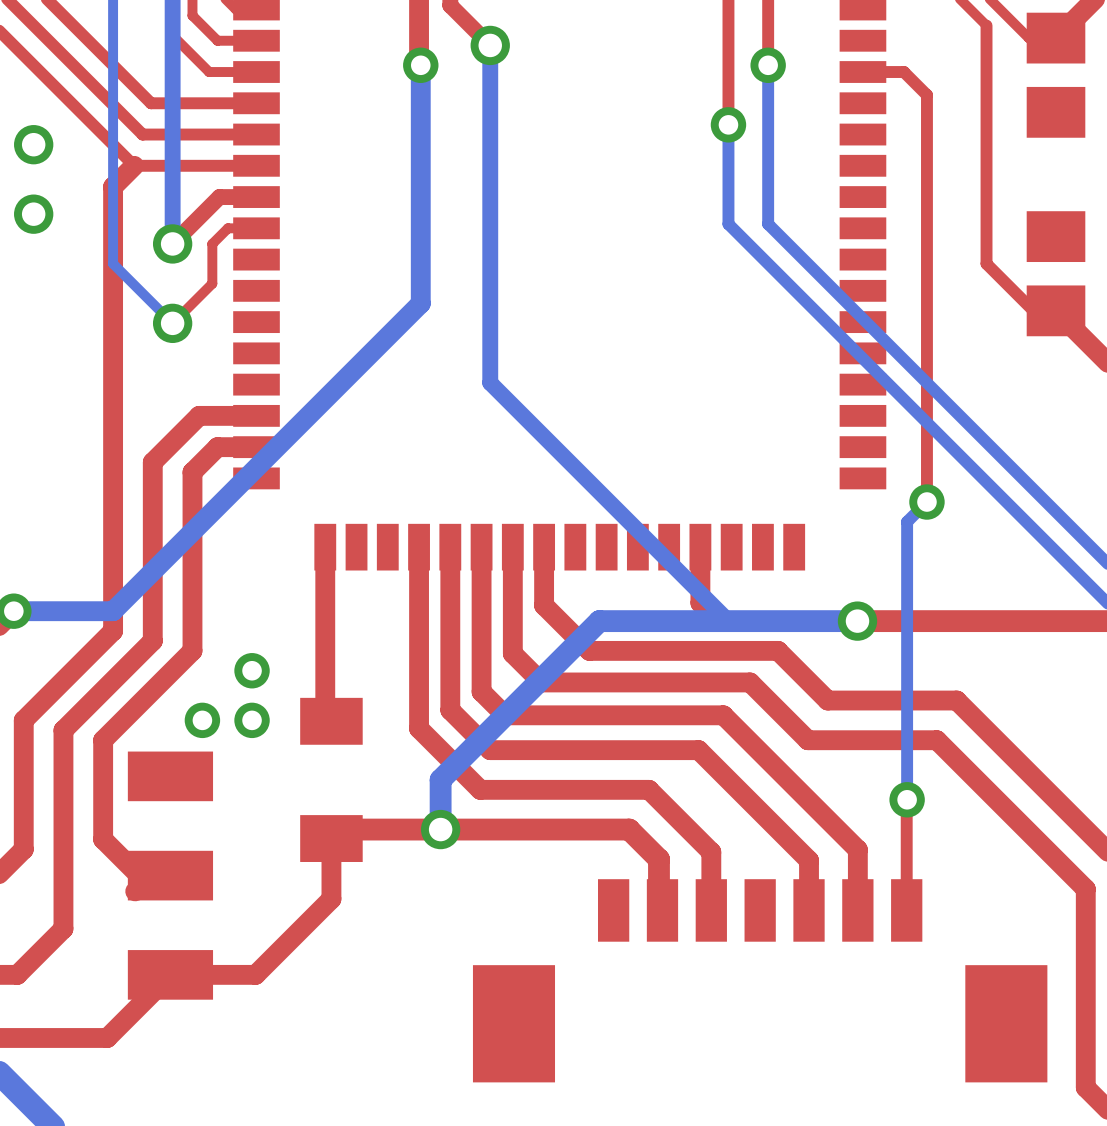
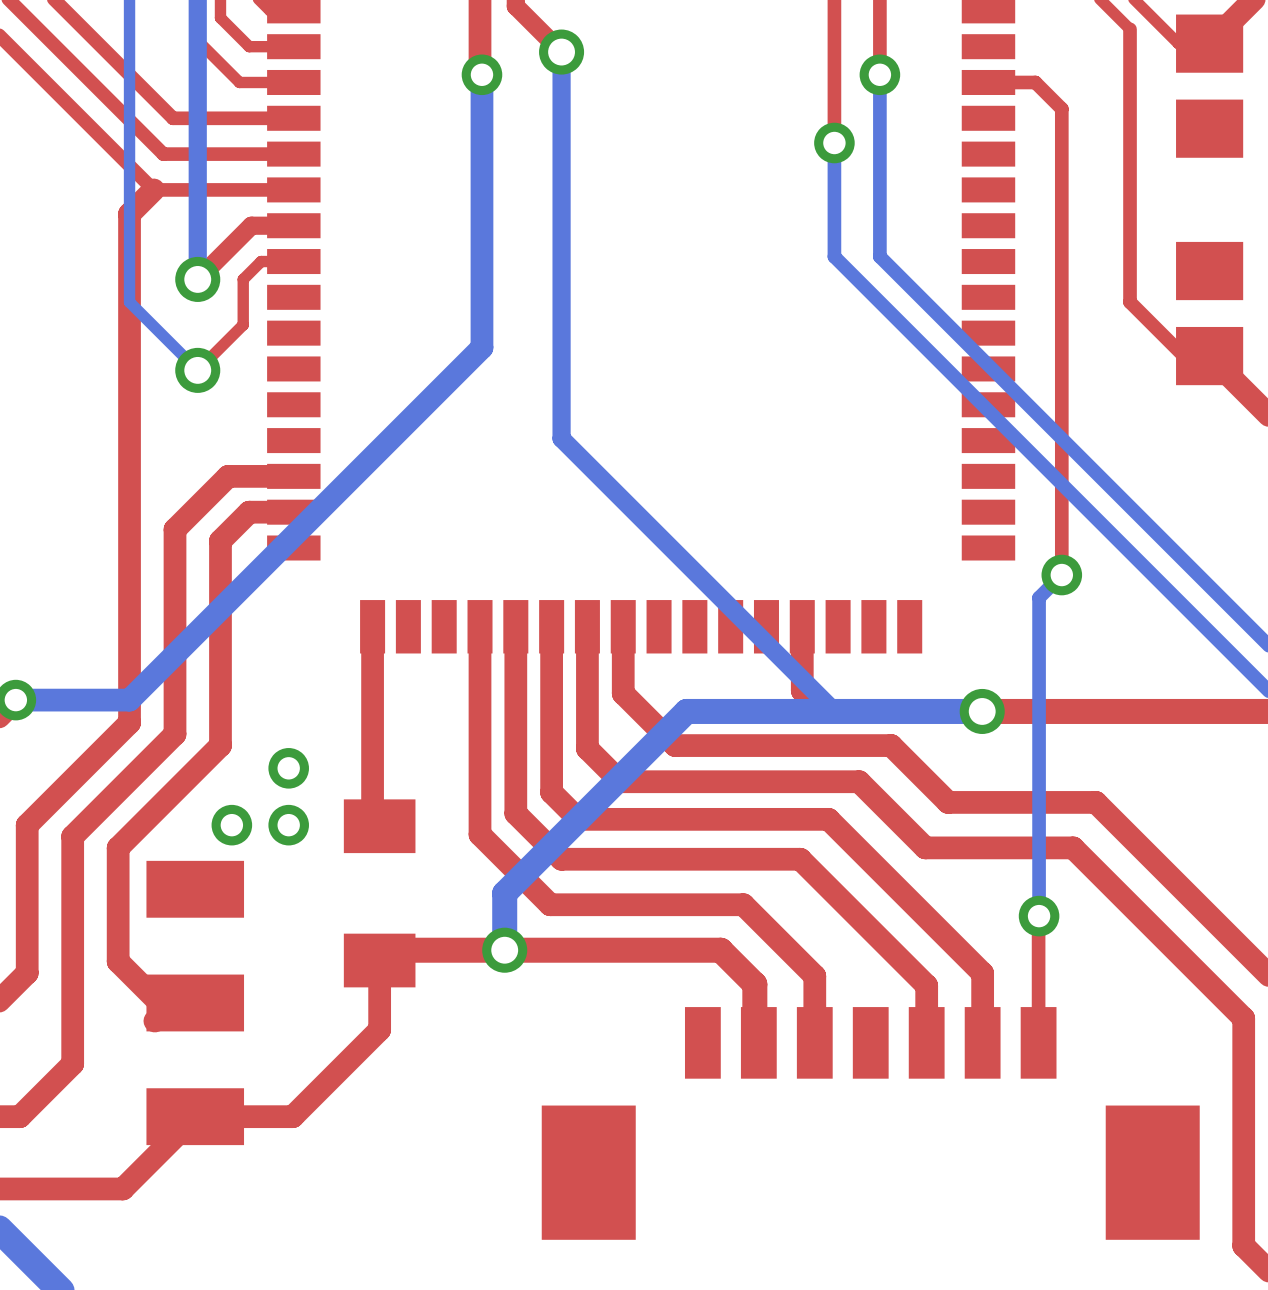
via: (33, 144) -> none
via: (33, 214) -> none

